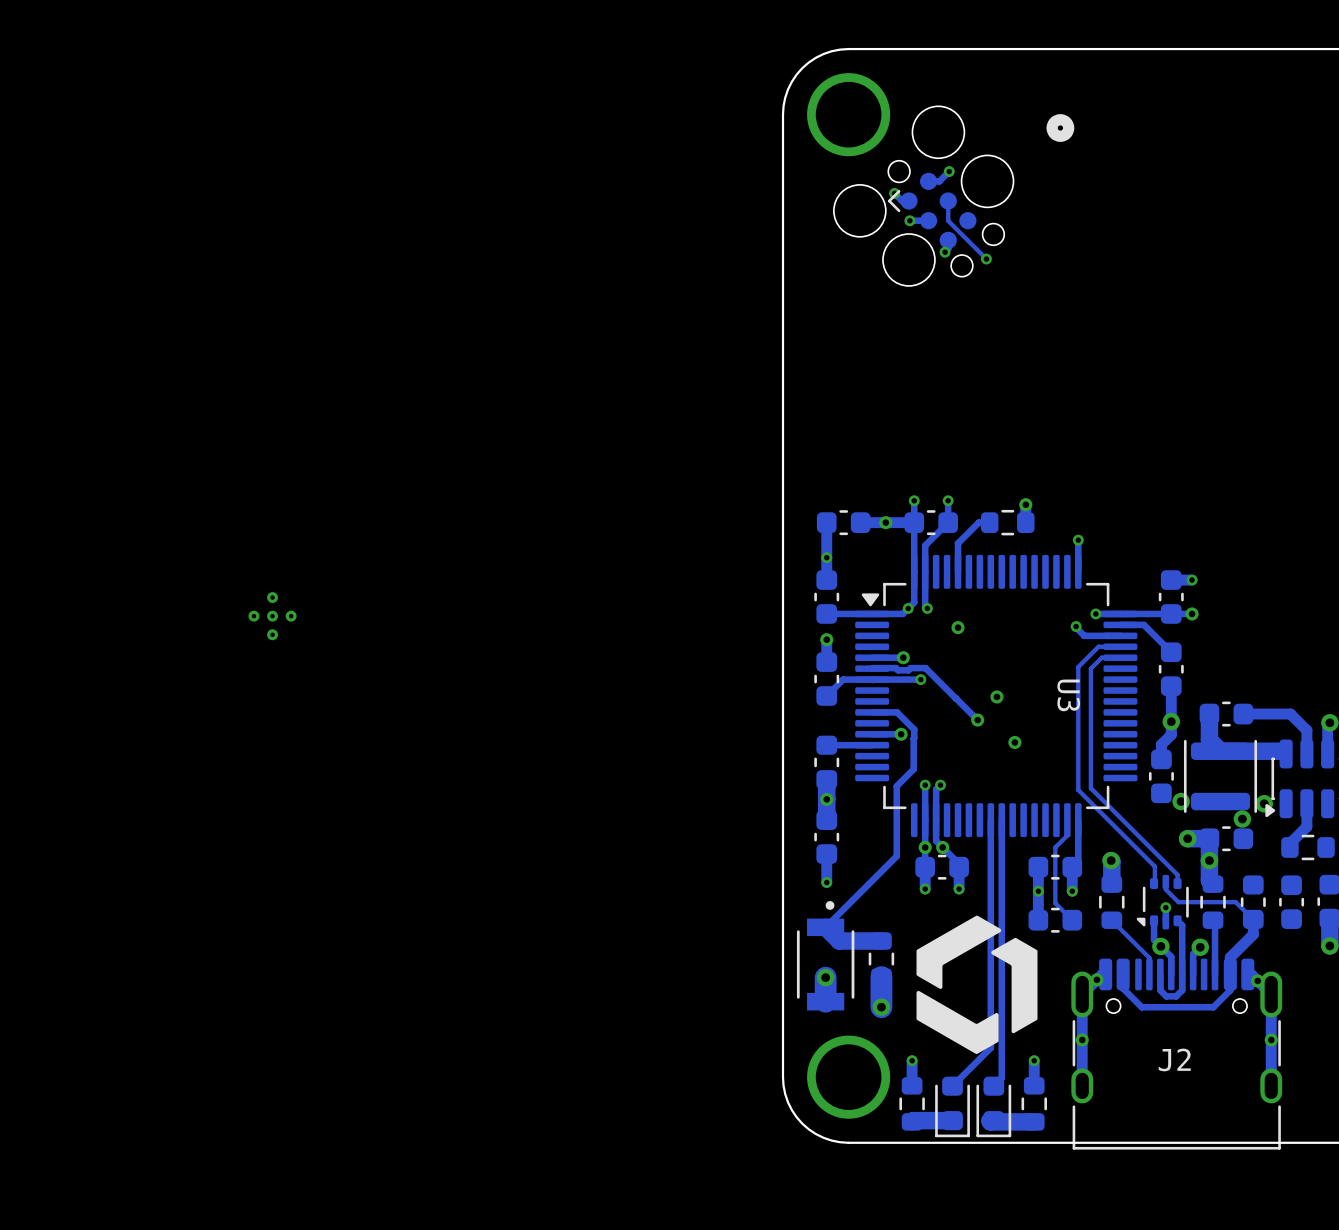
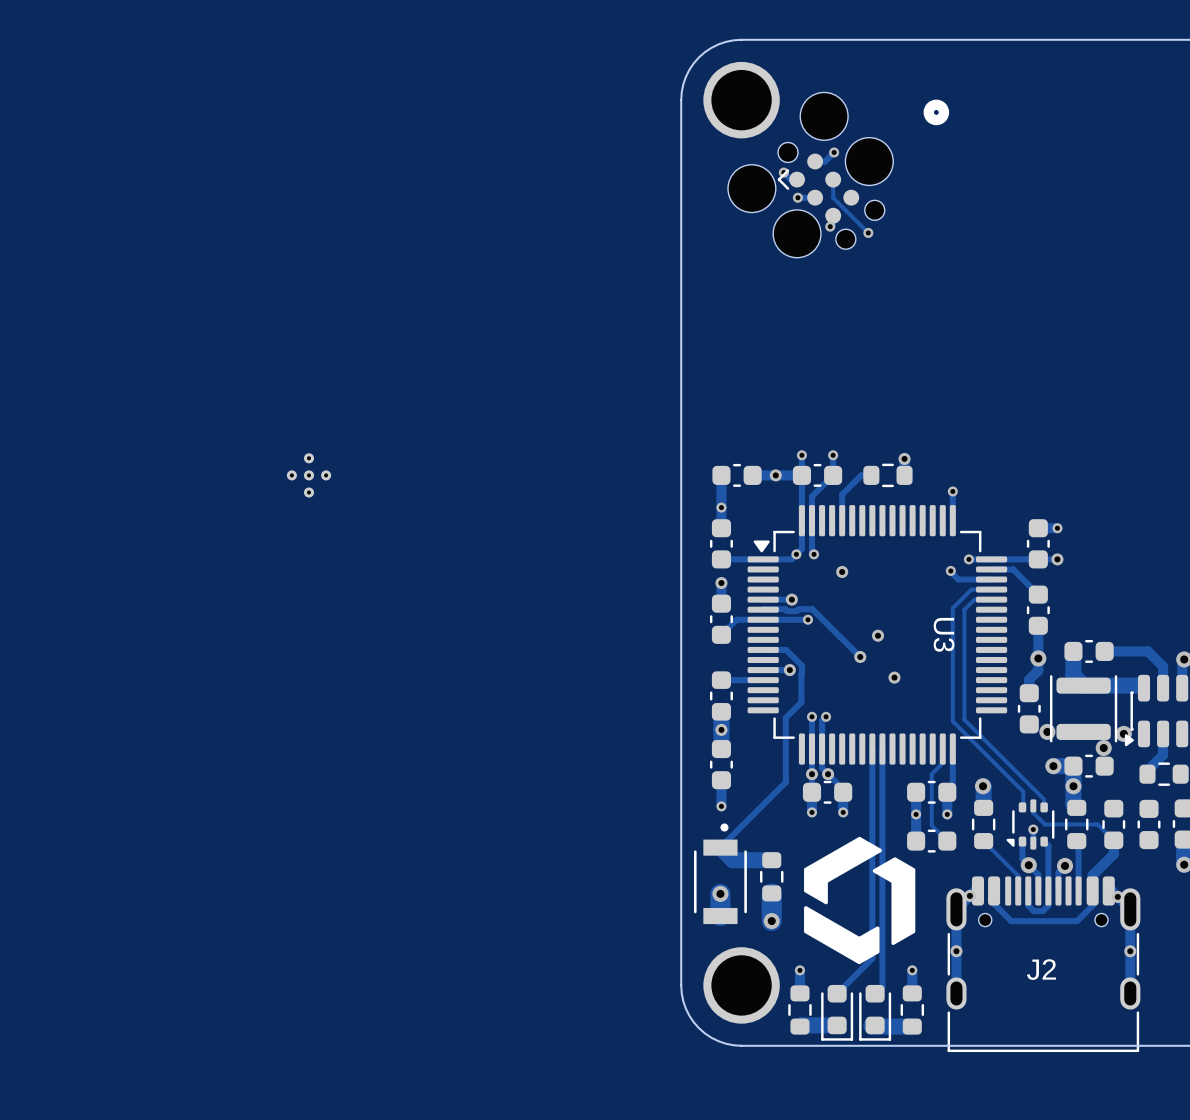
part position: (272, 616) -> (308, 475)

